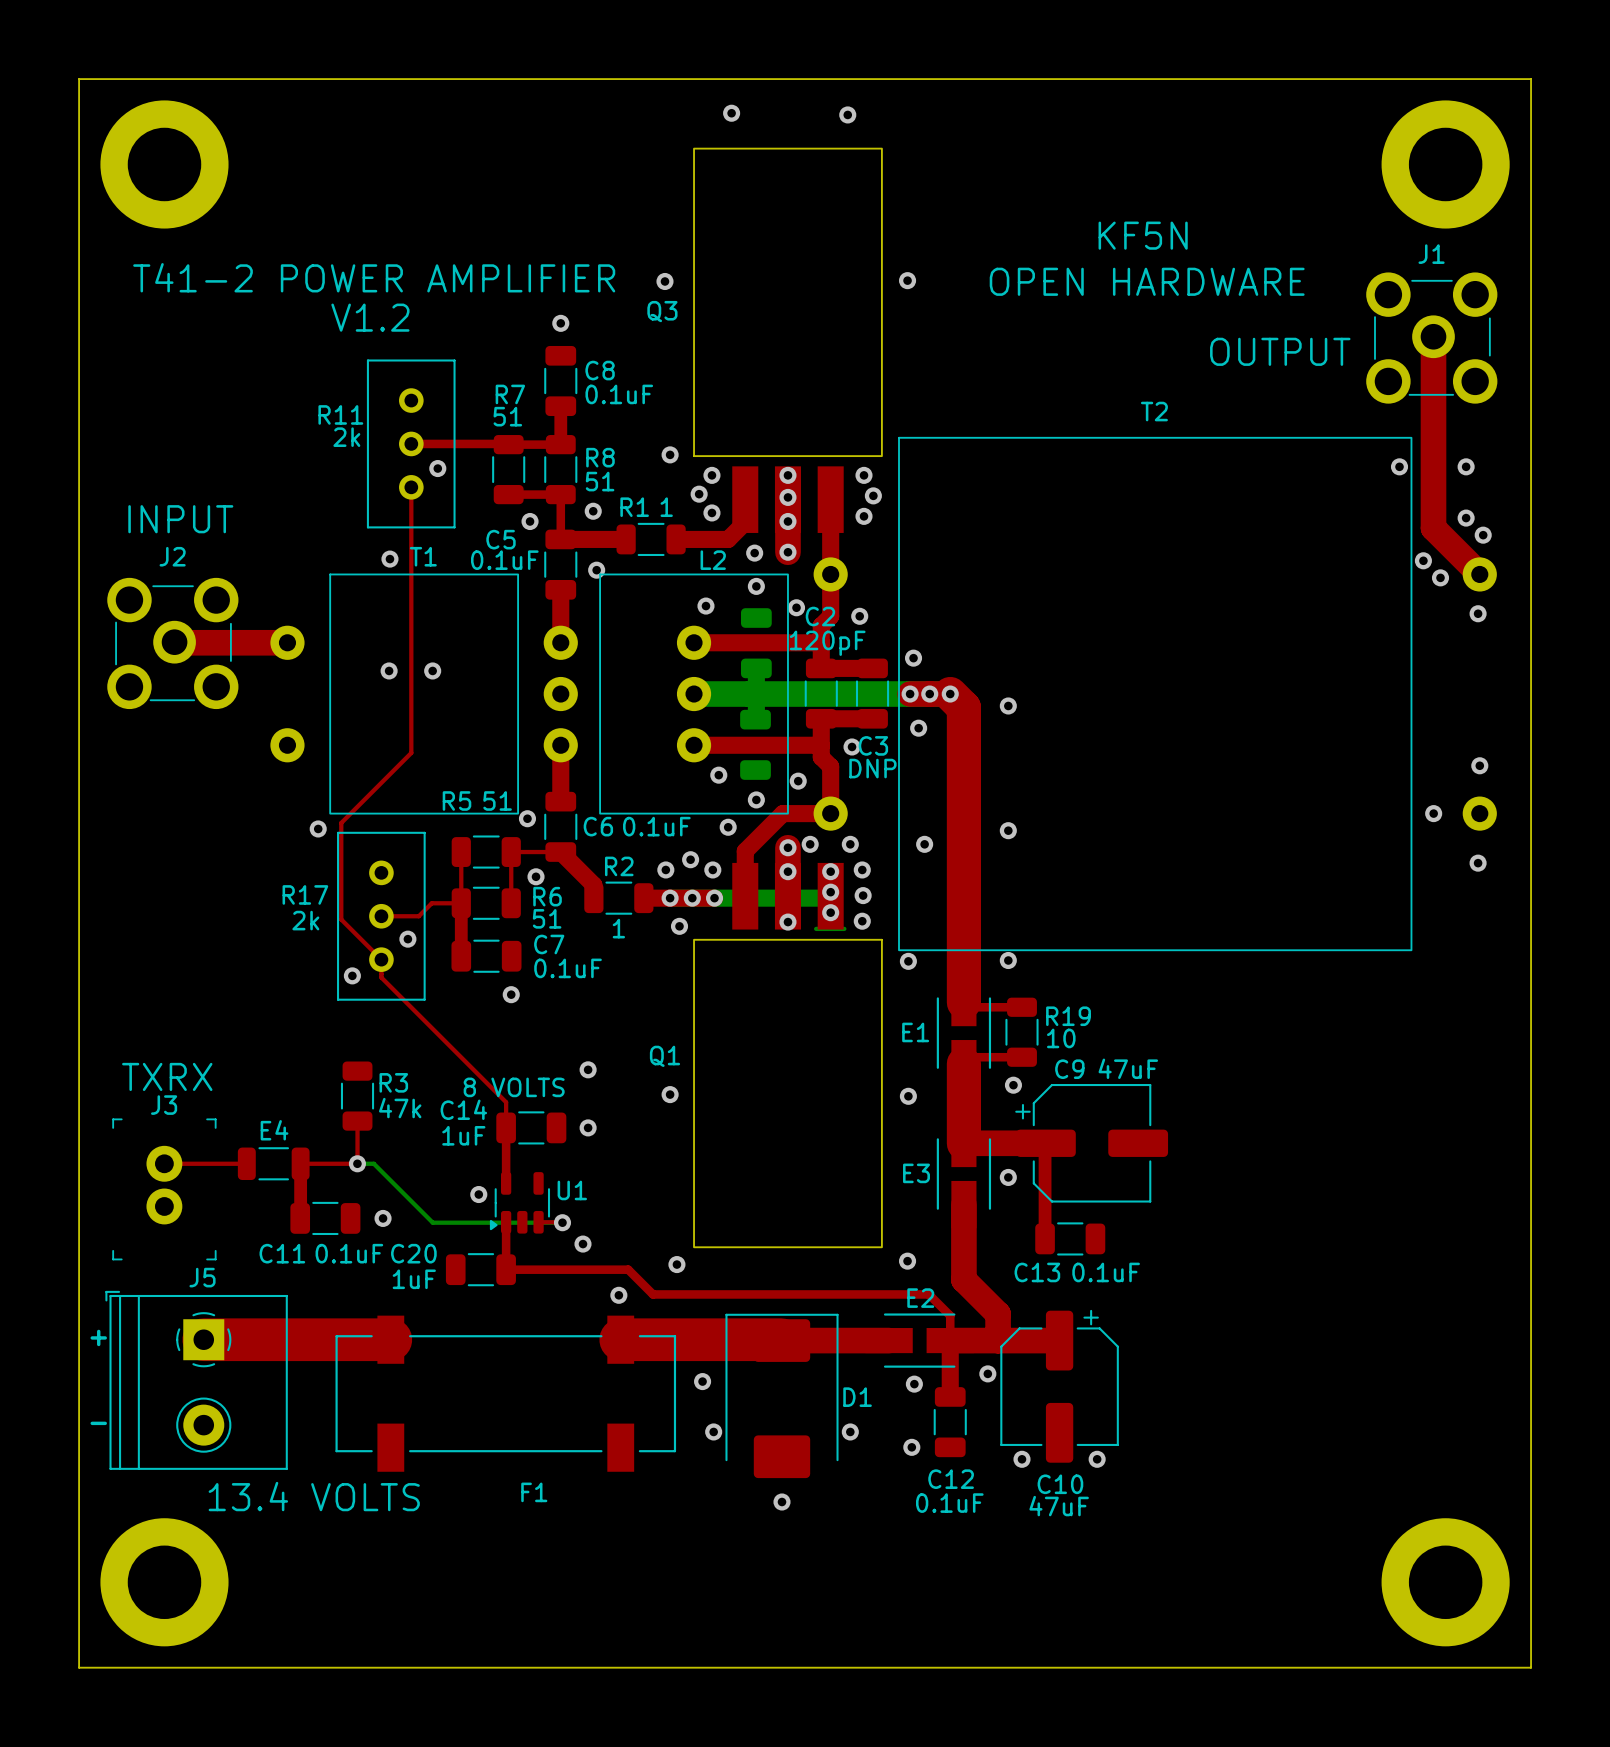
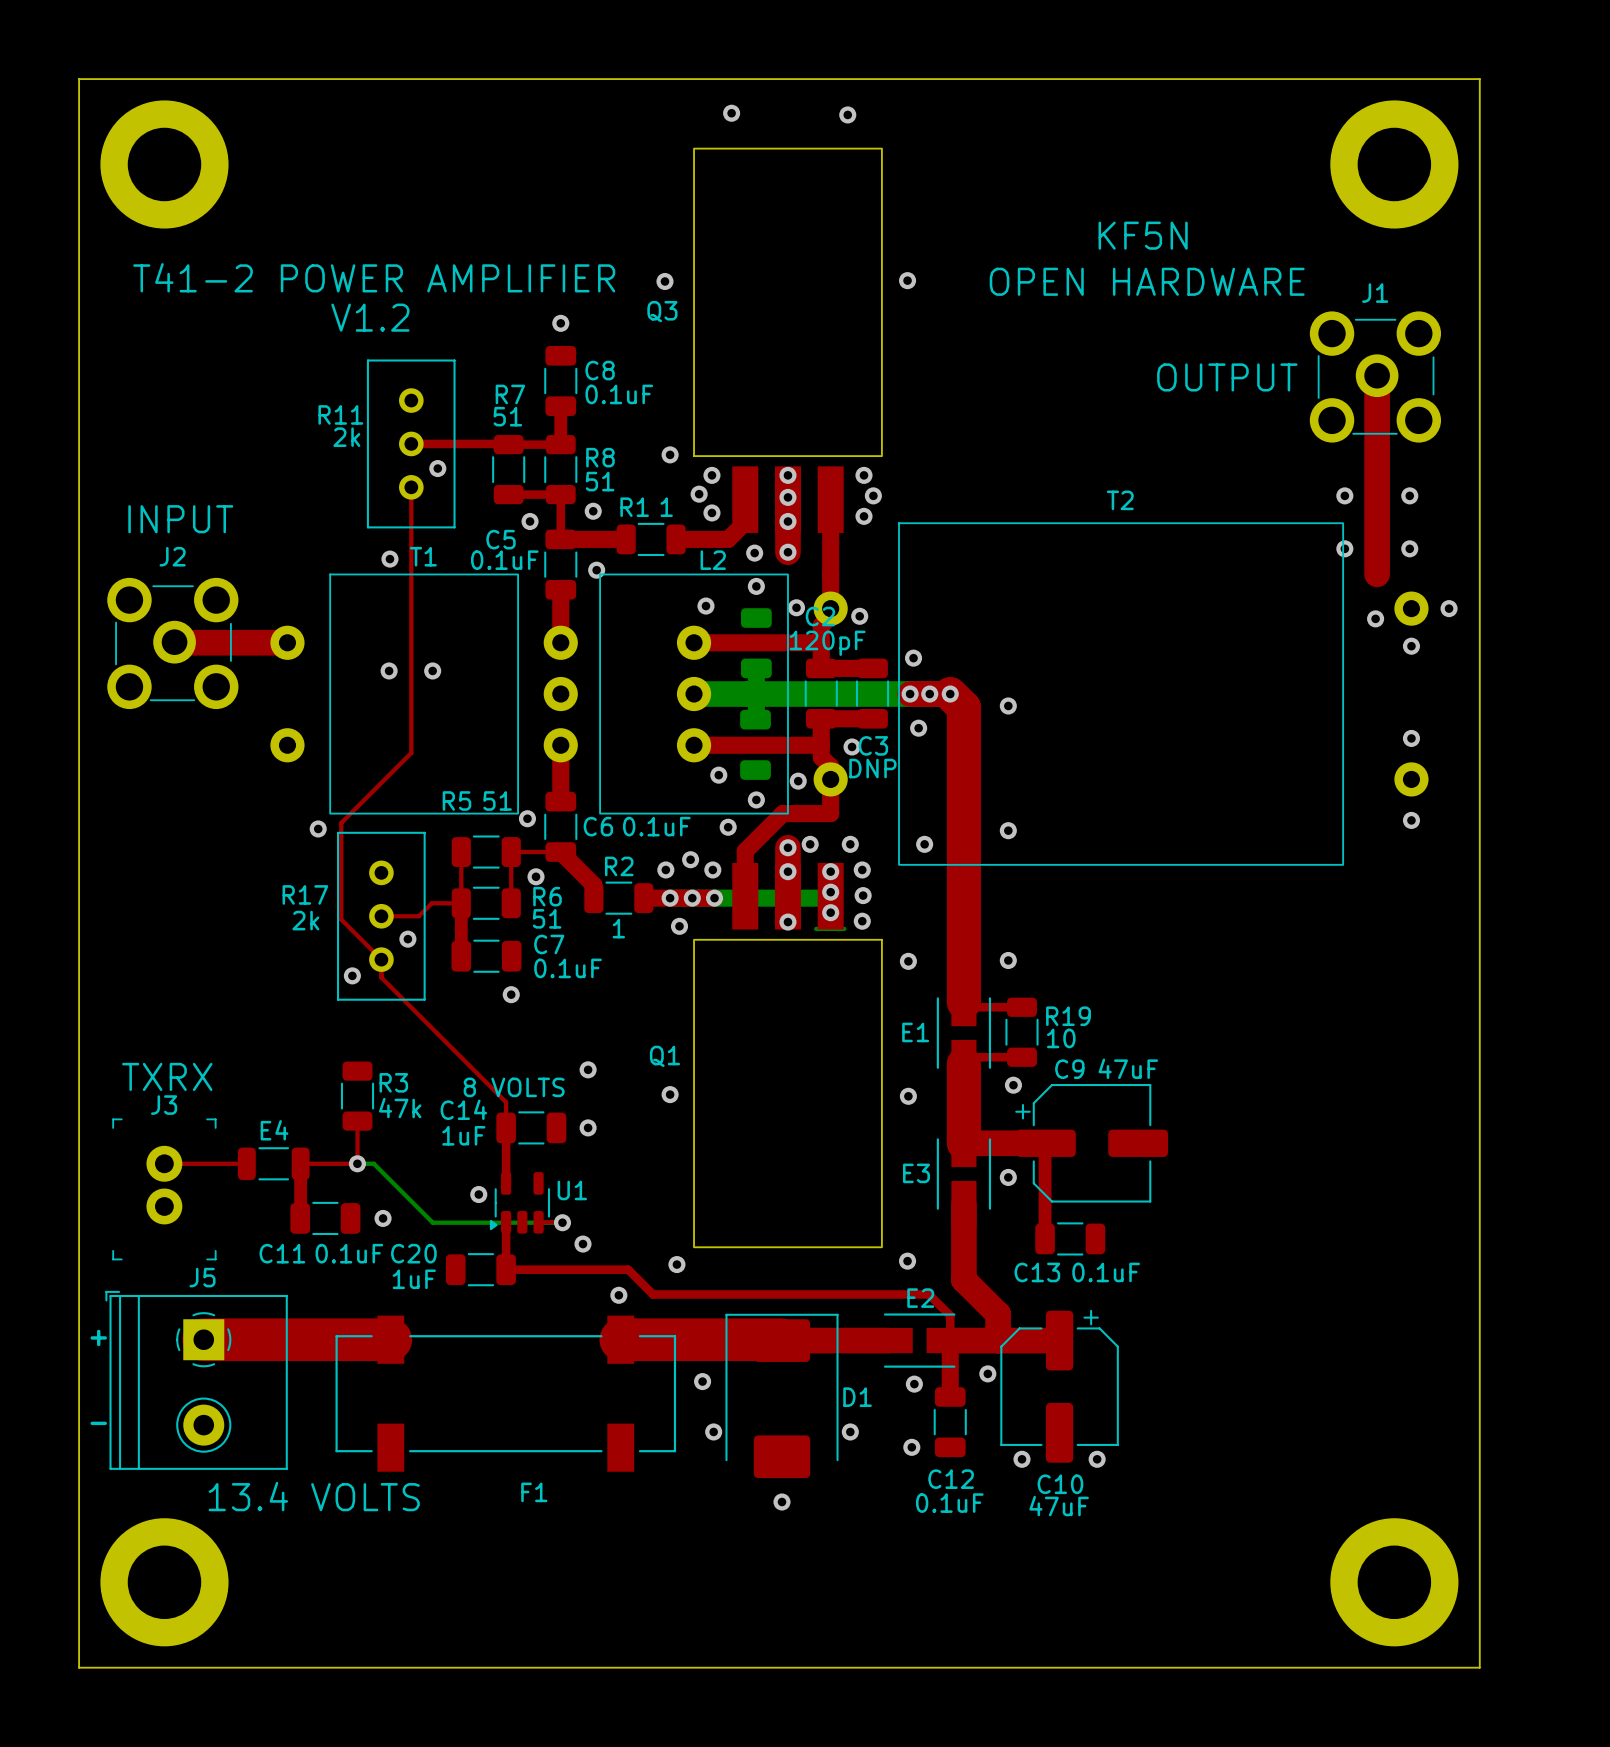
board edge: (1479, 79) (1531, 79) (1531, 1667) (1479, 1667) -> (1479, 79) (1479, 1667)
part position: (1445, 164) -> (1394, 164)
top track: (1433, 336) (1433, 528) (1479, 574) -> none
J1 position: (1431, 338) -> (1375, 376)
text position: OUTPUT (1280, 351) -> OUTPUT (1227, 377)
top track: none -> (1377, 375) (1377, 574)
T2 name position: T2 (1154, 411) -> T2 (1120, 500)
T2 footprint: [813, 437, 1497, 951] -> [813, 522, 1429, 866]
via: (1399, 466) -> none
via: (1466, 466) -> none
via: none -> (1344, 495)
via: none -> (1409, 495)
via: (1466, 518) -> none
via: (1483, 535) -> none
via: none -> (1344, 548)
via position: (1423, 560) -> (1409, 548)
via: (1440, 577) -> none
via: none -> (1449, 608)
via: (1478, 613) -> none
via: none -> (1375, 618)
via: none -> (1411, 646)
via: none -> (1411, 738)
via: (1479, 765) -> none
via position: (1433, 813) -> (1411, 820)
via: (1478, 863) -> none
part position: (1445, 1582) -> (1394, 1582)

